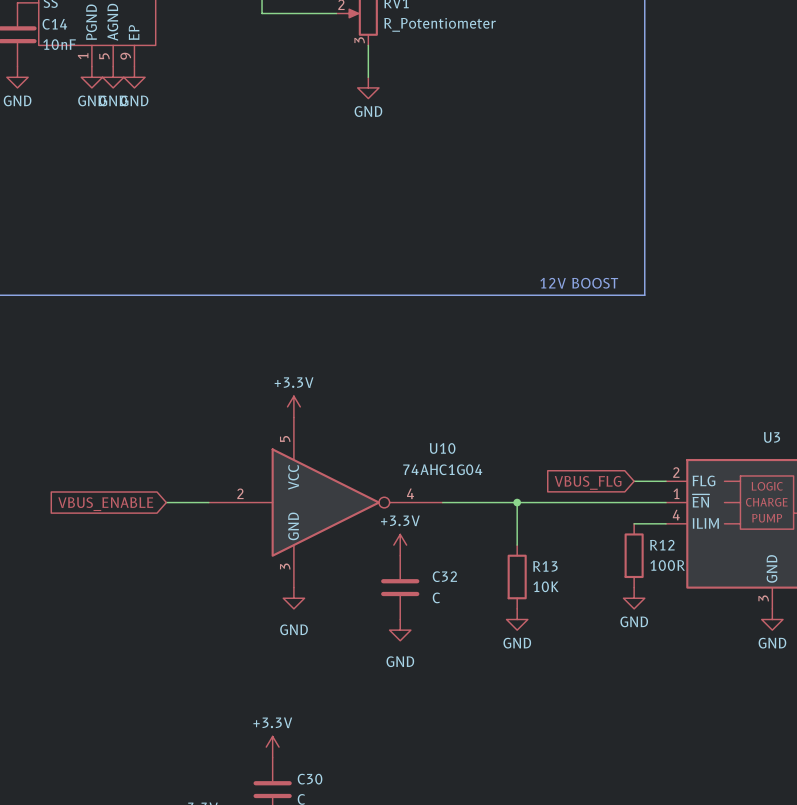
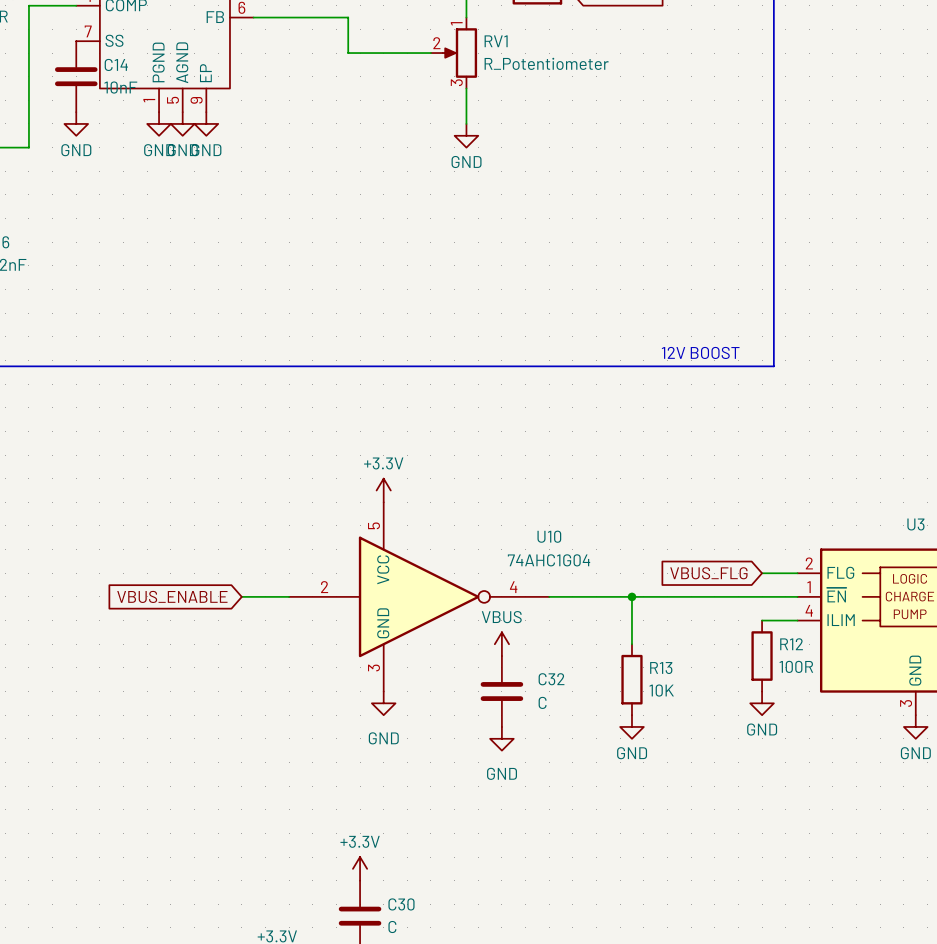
power symbol: +3.3V (400, 545) -> VBUS (501, 644)

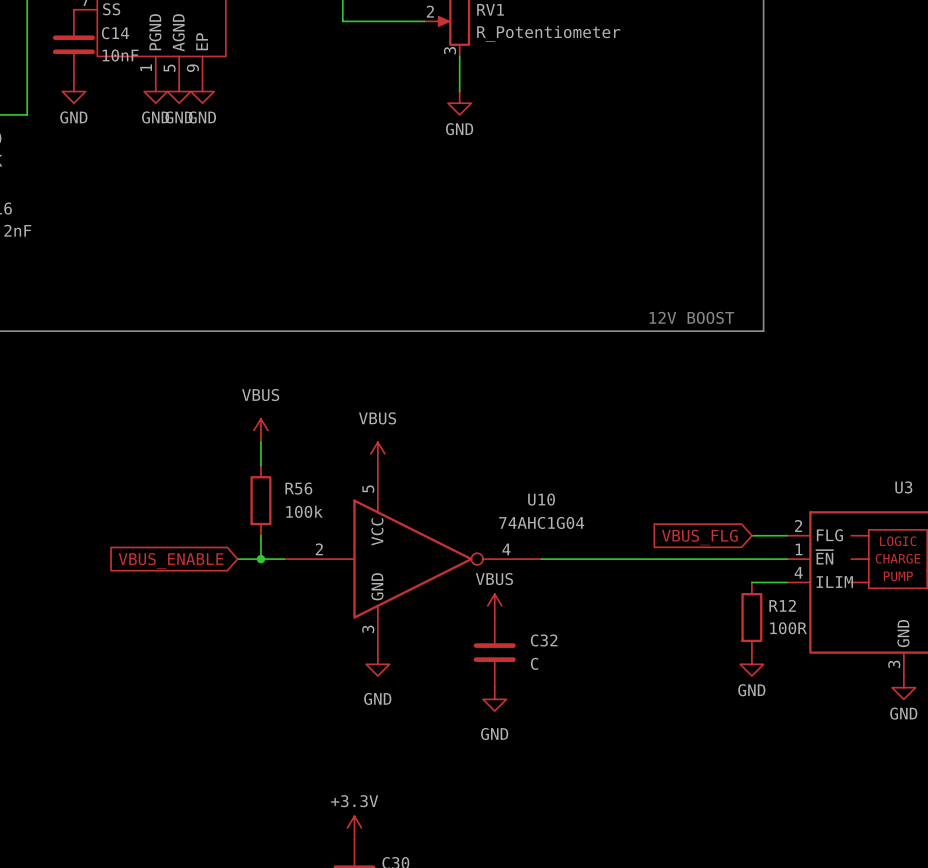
power symbol: none -> VBUS (260, 430)
wire: none -> (260, 442) (260, 465)
power symbol: +3.3V (383, 490) -> VBUS (377, 453)
R56: none -> 100k (260, 500)
wire: none -> (260, 535) (260, 559)
junction: none -> (260, 559)
wire: (631, 596) (631, 644) -> none
junction: (631, 596) -> none
R13: 10K (631, 679) -> none
power symbol: GND (631, 726) -> none

